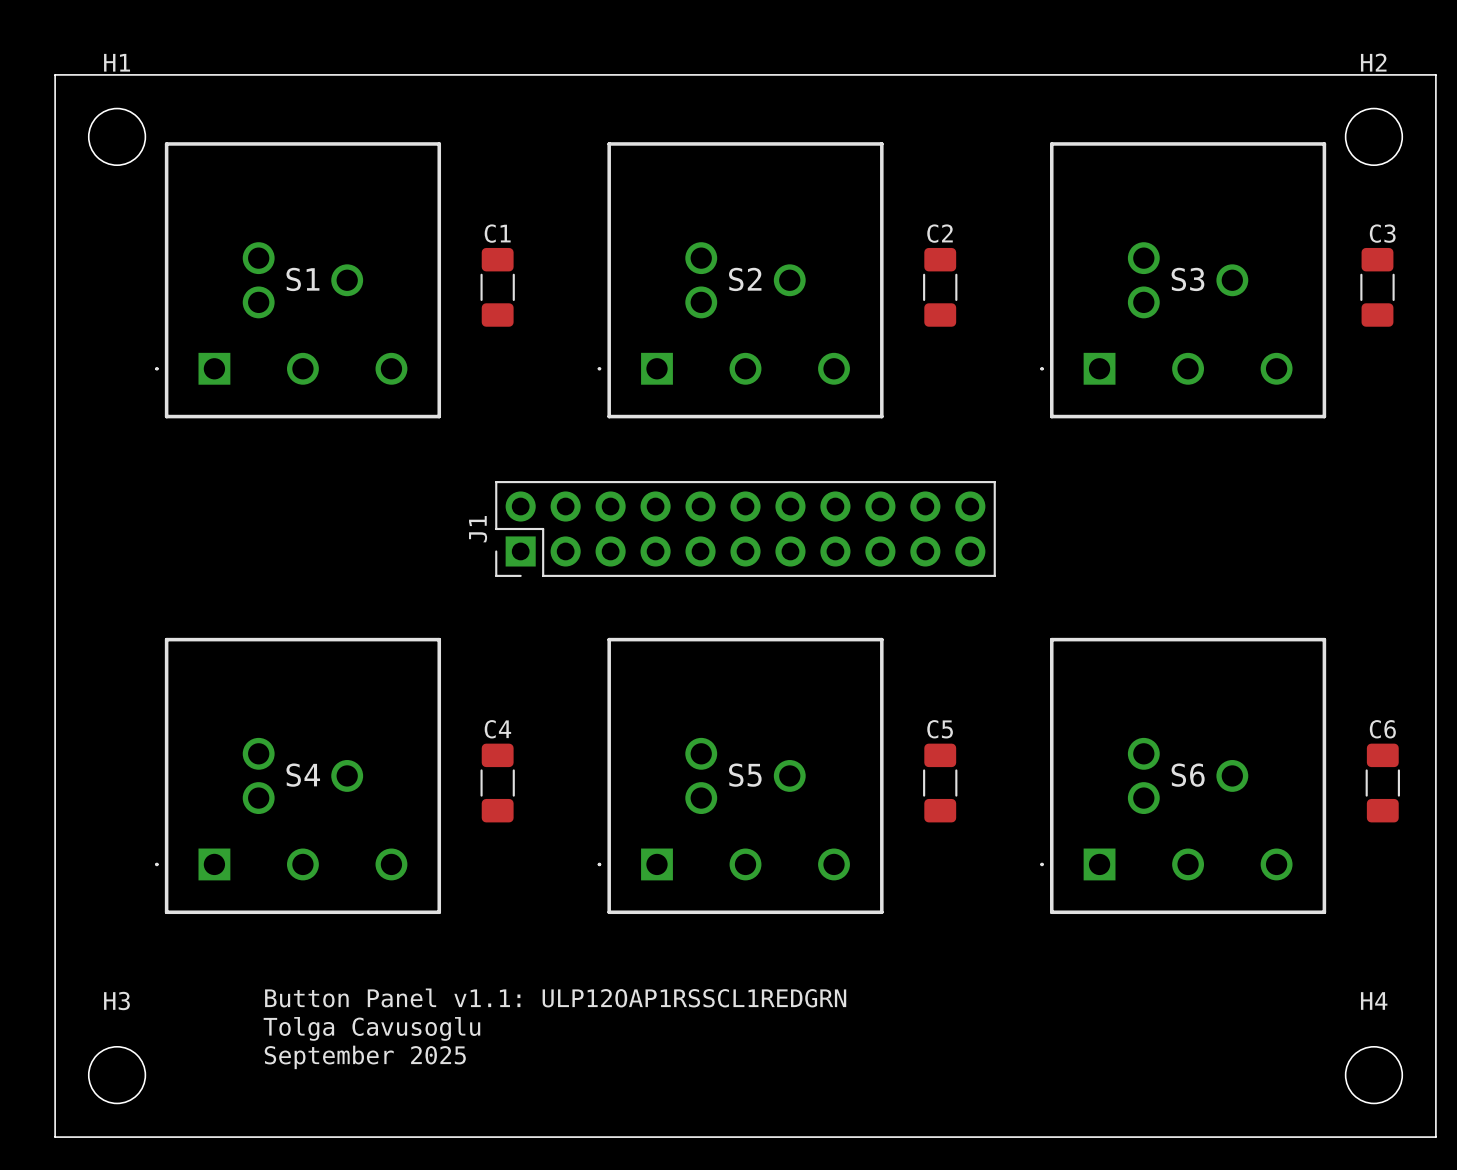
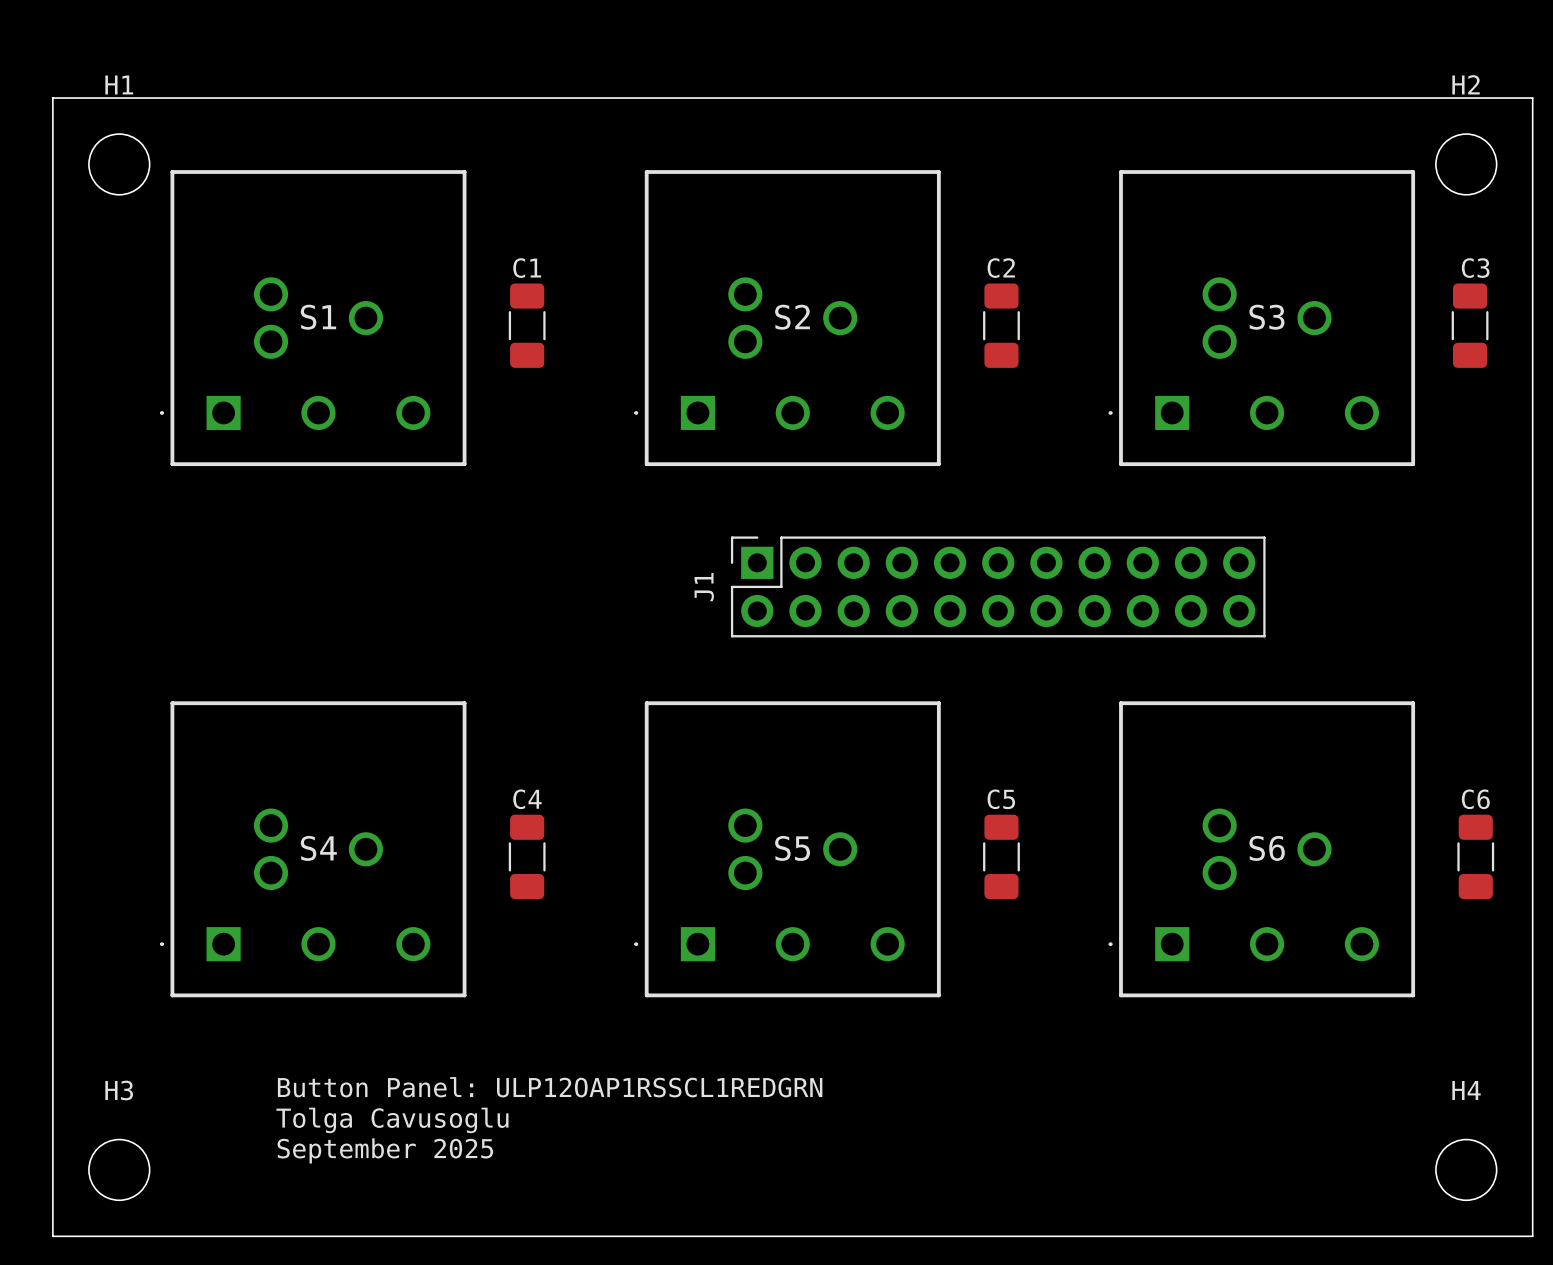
J1 footprint: [495, 481, 996, 577] -> [730, 536, 1266, 638]
text: Button Panel v1.1: ULP12OAP1RSSCL1REDGRN (555, 997) -> Button Panel: ULP12OAP1RSSCL1REDGRN (550, 1087)

